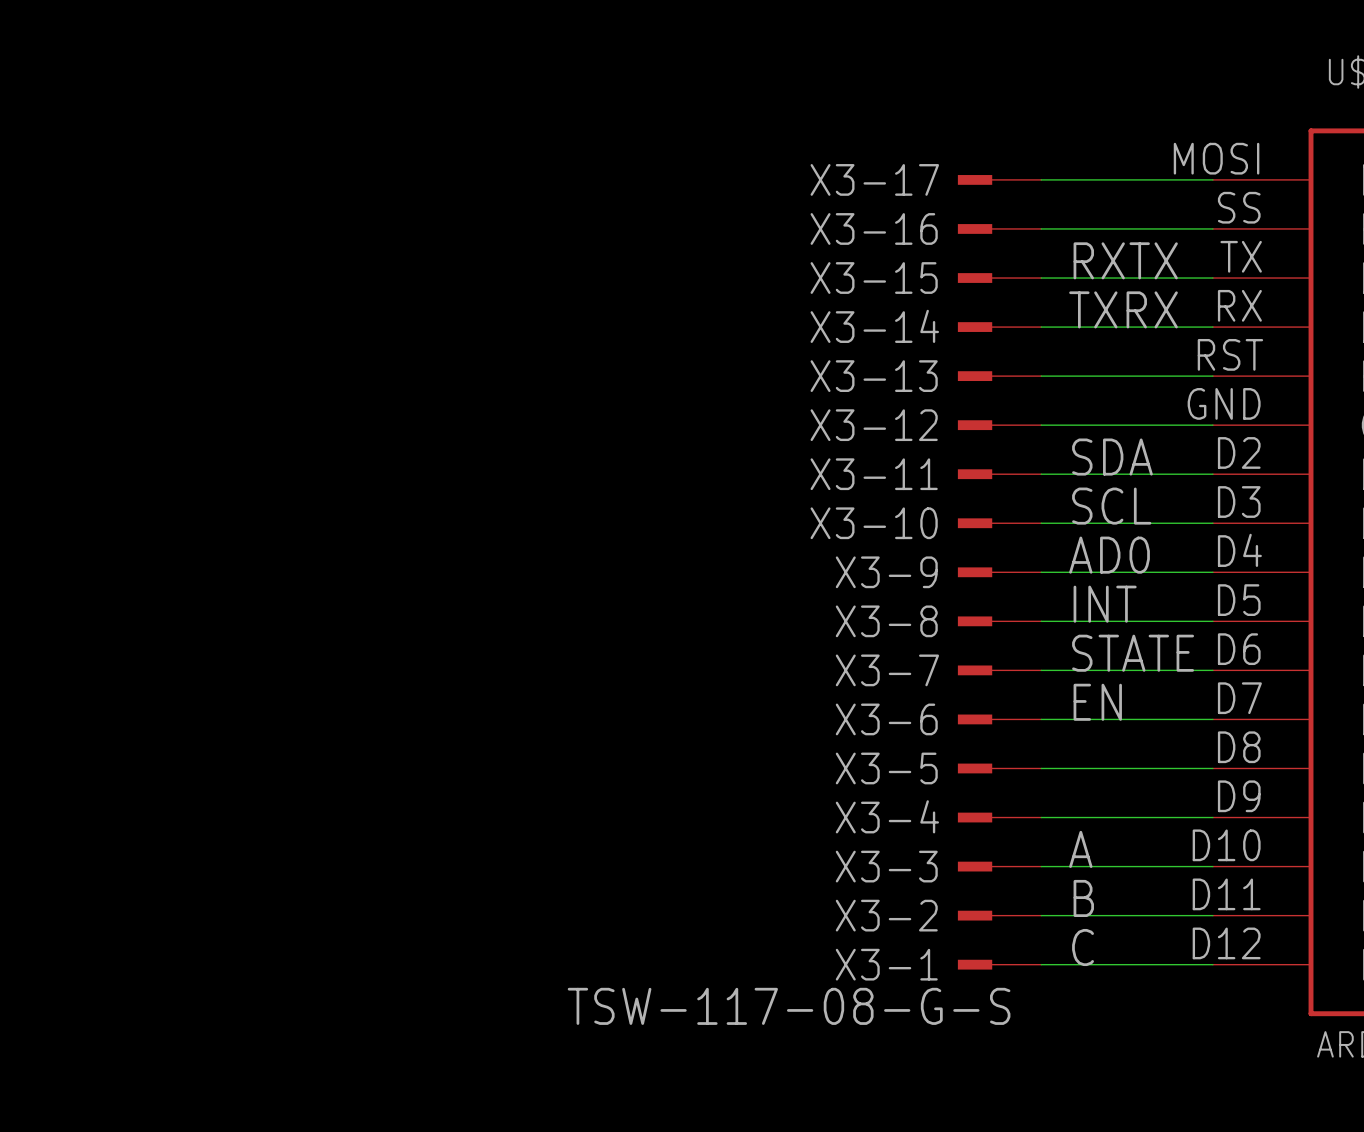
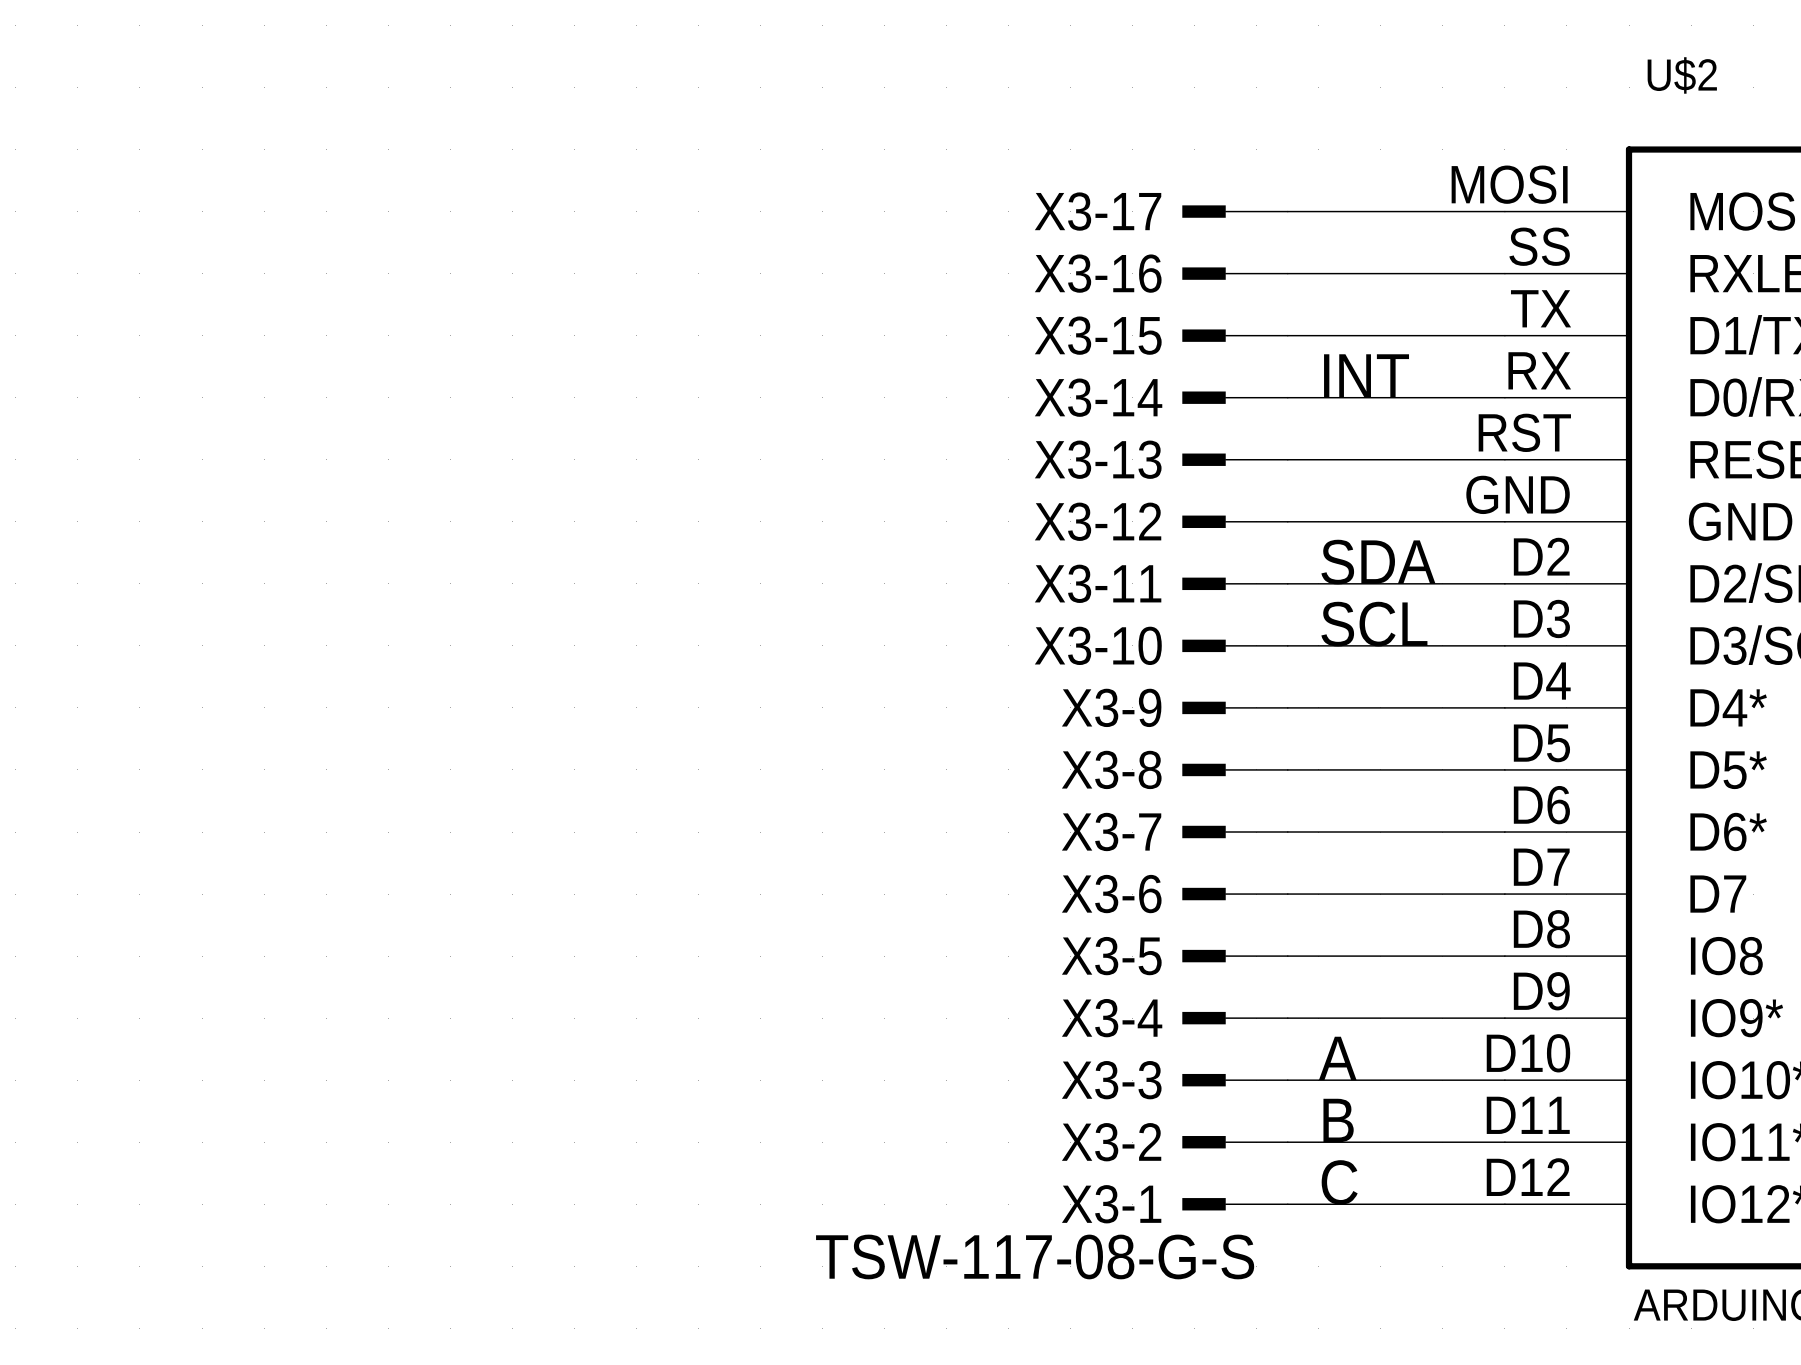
label: RXTX (1125, 260) -> none
label: TXRX (1123, 309) -> INT (1366, 375)
label: AD0 (1109, 555) -> none
label: INT (1105, 604) -> none
label: STATE (1133, 653) -> none
label: EN (1097, 702) -> none

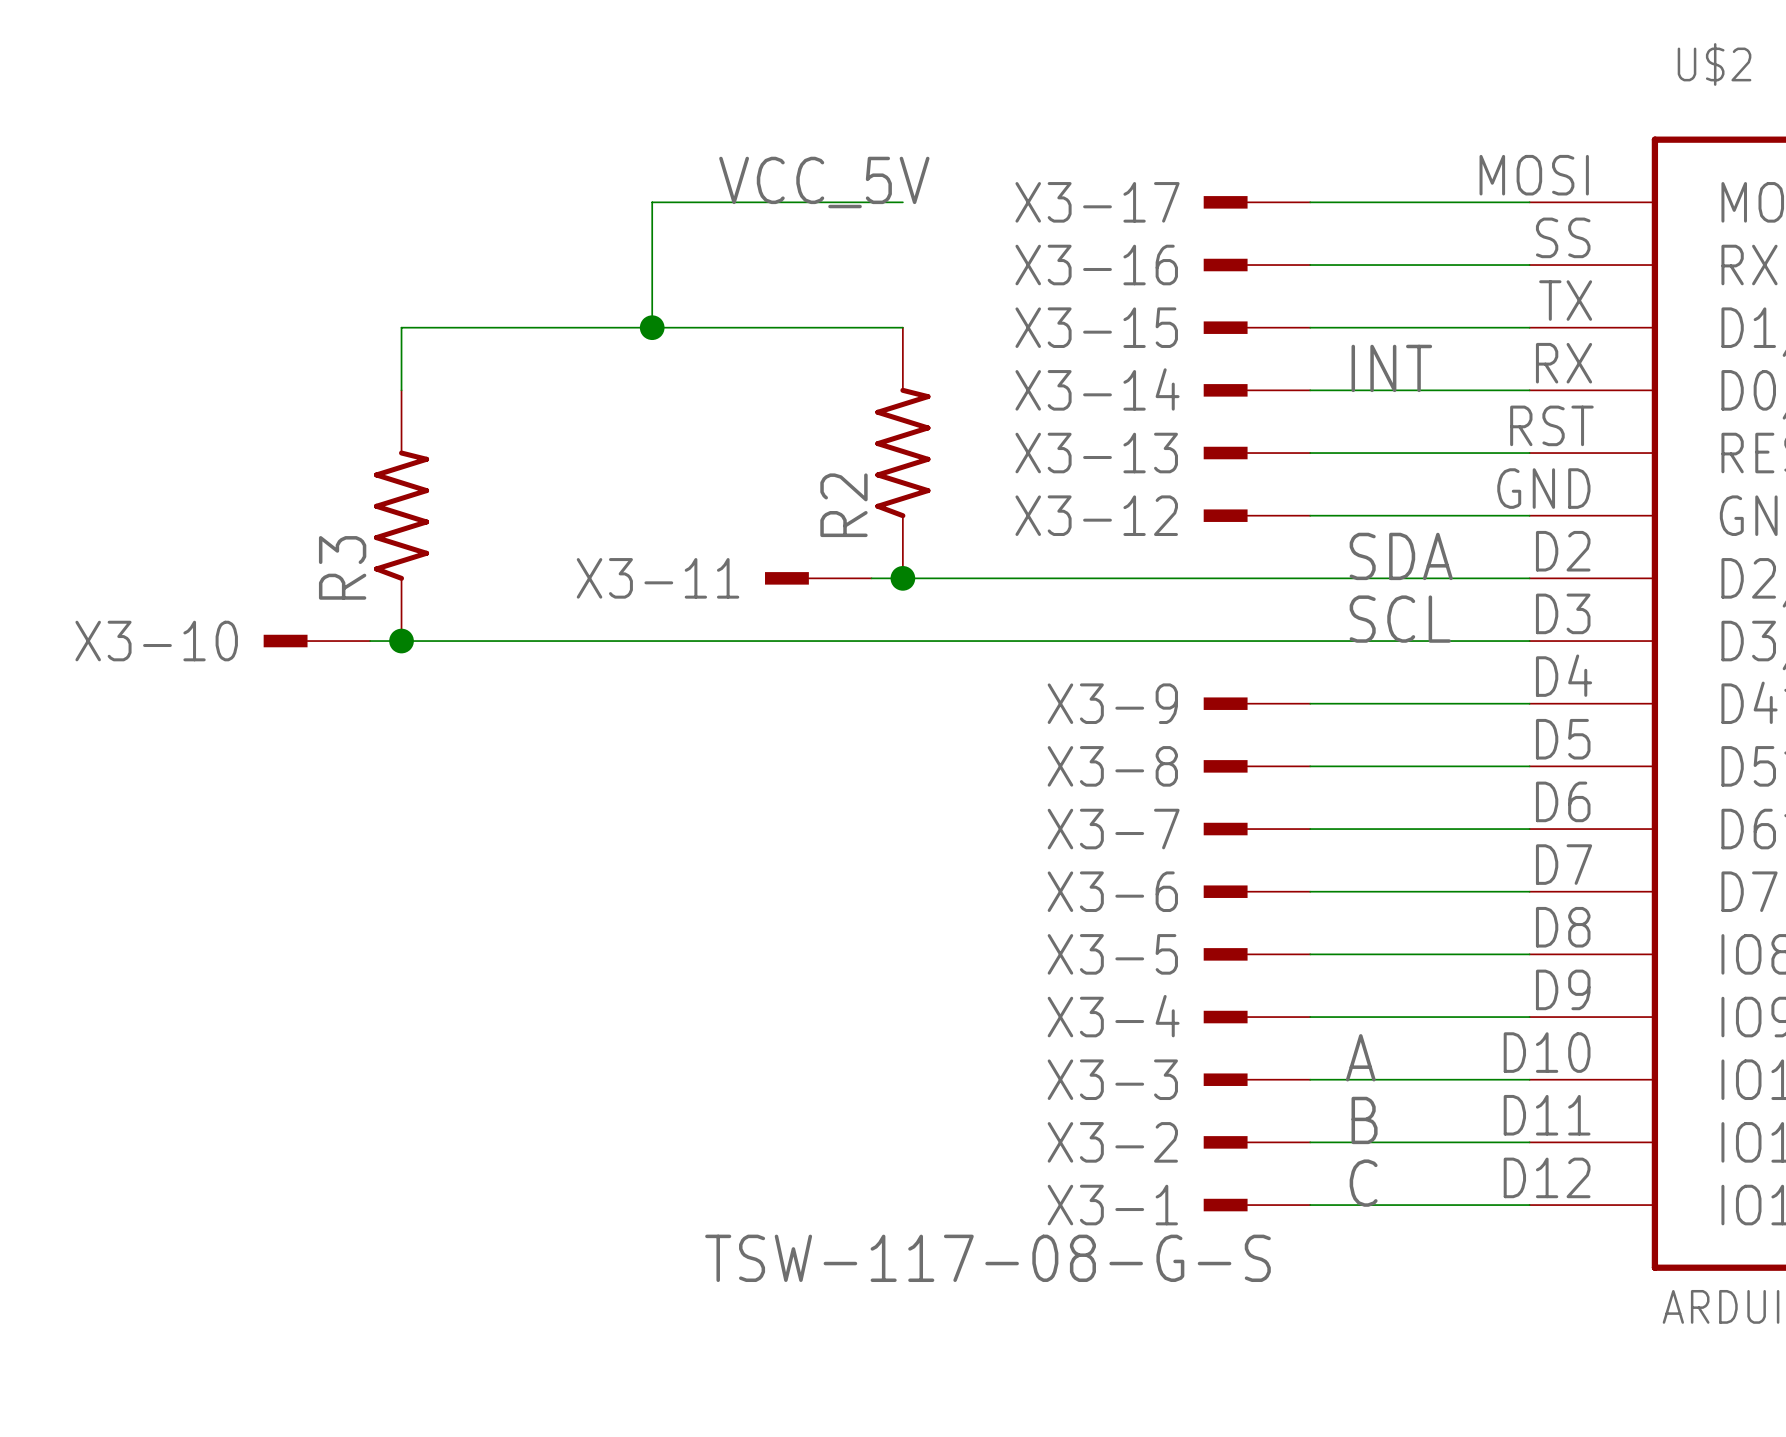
label: none -> VCC_5V (824, 182)
wire: none -> (902, 202) (652, 202) (652, 327)
junction: none -> (652, 327)
wire: none -> (902, 327) (401, 327) (401, 390)
R2: none -> (902, 453)
R3: none -> (401, 515)
wire: none -> (871, 578) (1310, 578)
junction: none -> (902, 578)
X3-11 position: (1235, 583) -> (818, 578)
wire: none -> (370, 641) (1310, 641)
junction: none -> (401, 641)
X3-10 position: (1235, 645) -> (316, 641)

